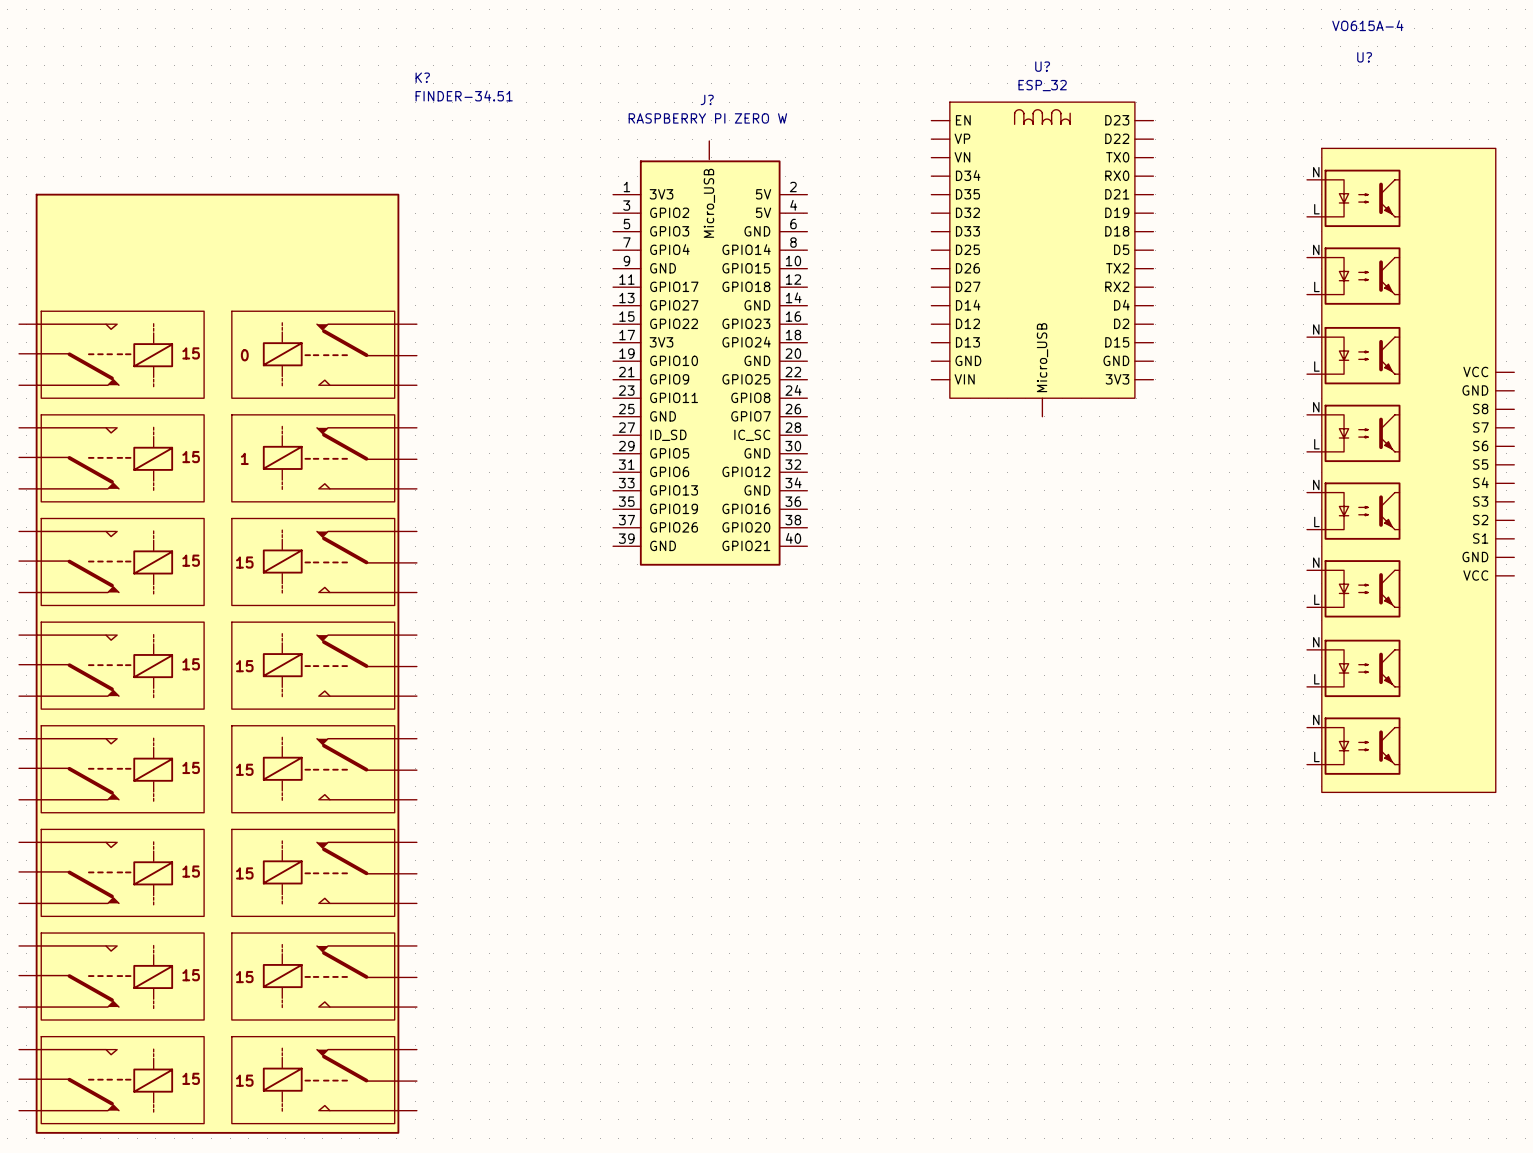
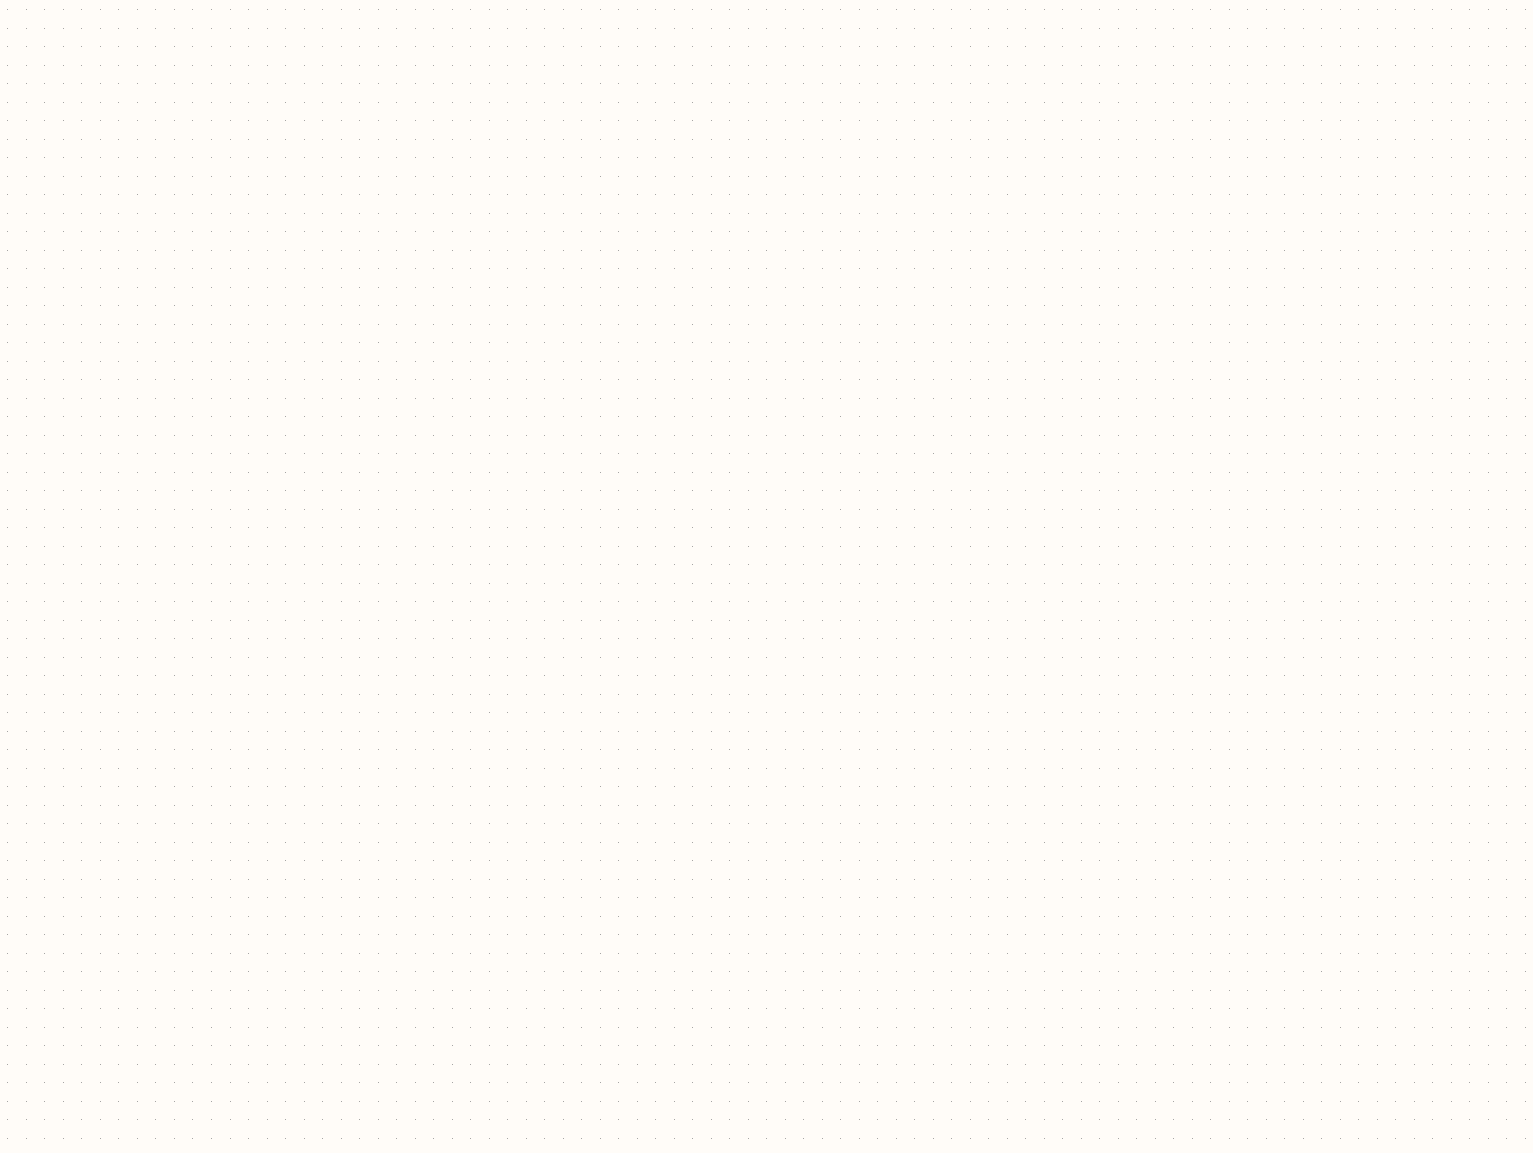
U?: ESP_32 (1042, 259) -> none
J?: RASPBERRY PI ZERO W (710, 353) -> none
U?: VO615A-4 (1410, 470) -> none
K?: FINDER-34.51 (217, 663) -> none

